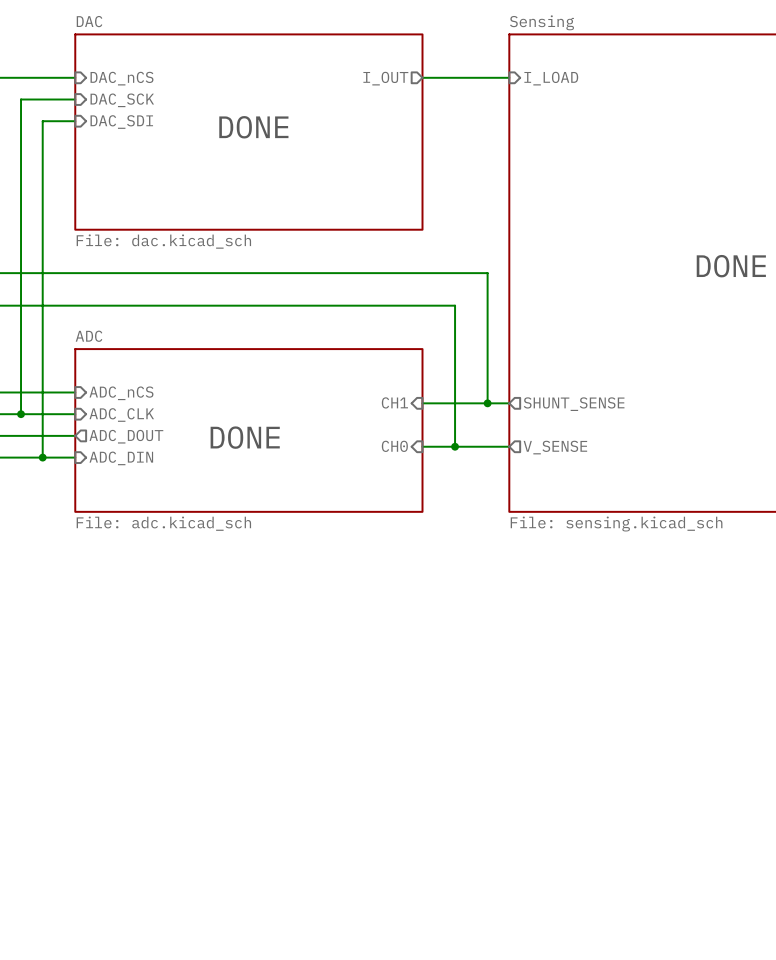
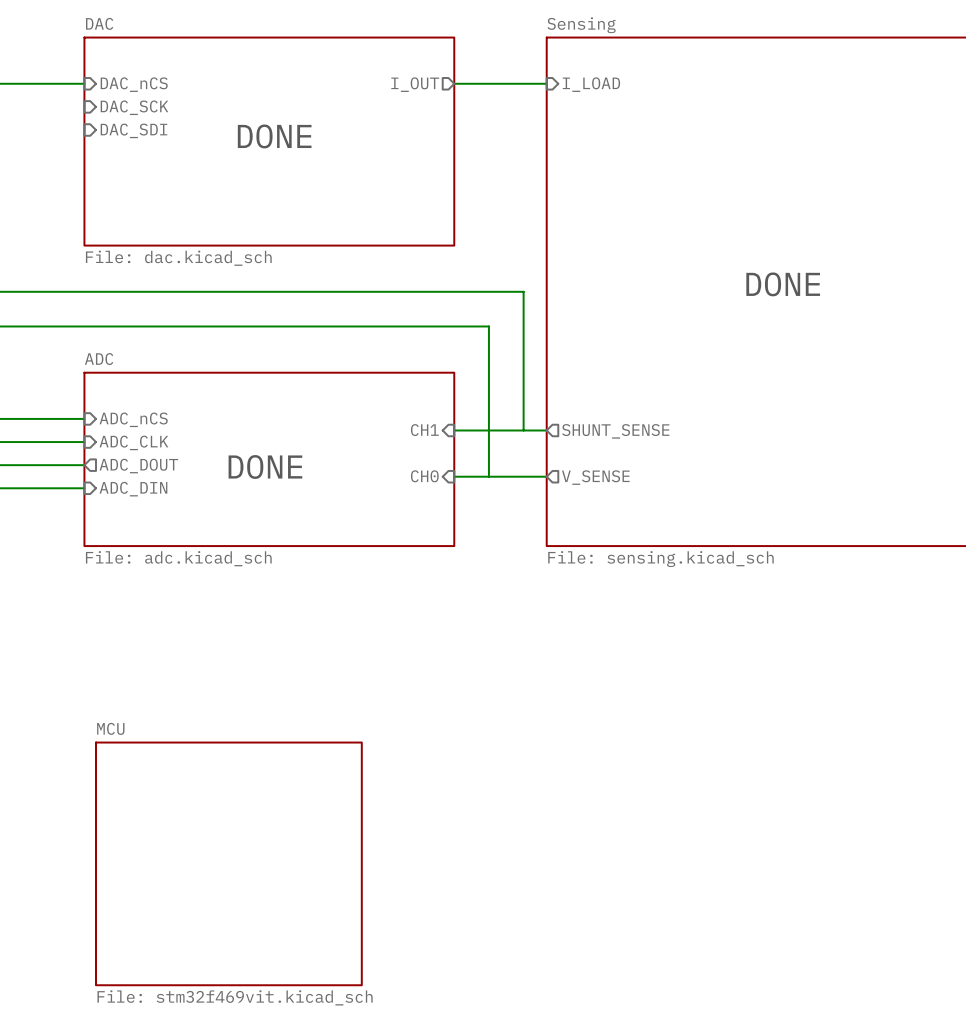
wire: (75, 99) (21, 99) (21, 414) -> none
wire: (75, 121) (42, 121) (42, 457) -> none
junction: (487, 403) -> none
junction: (21, 414) -> none
junction: (455, 446) -> none
junction: (42, 457) -> none
sheet MCU: none -> File: stm32f469vit.kicad_sch (228, 863)

